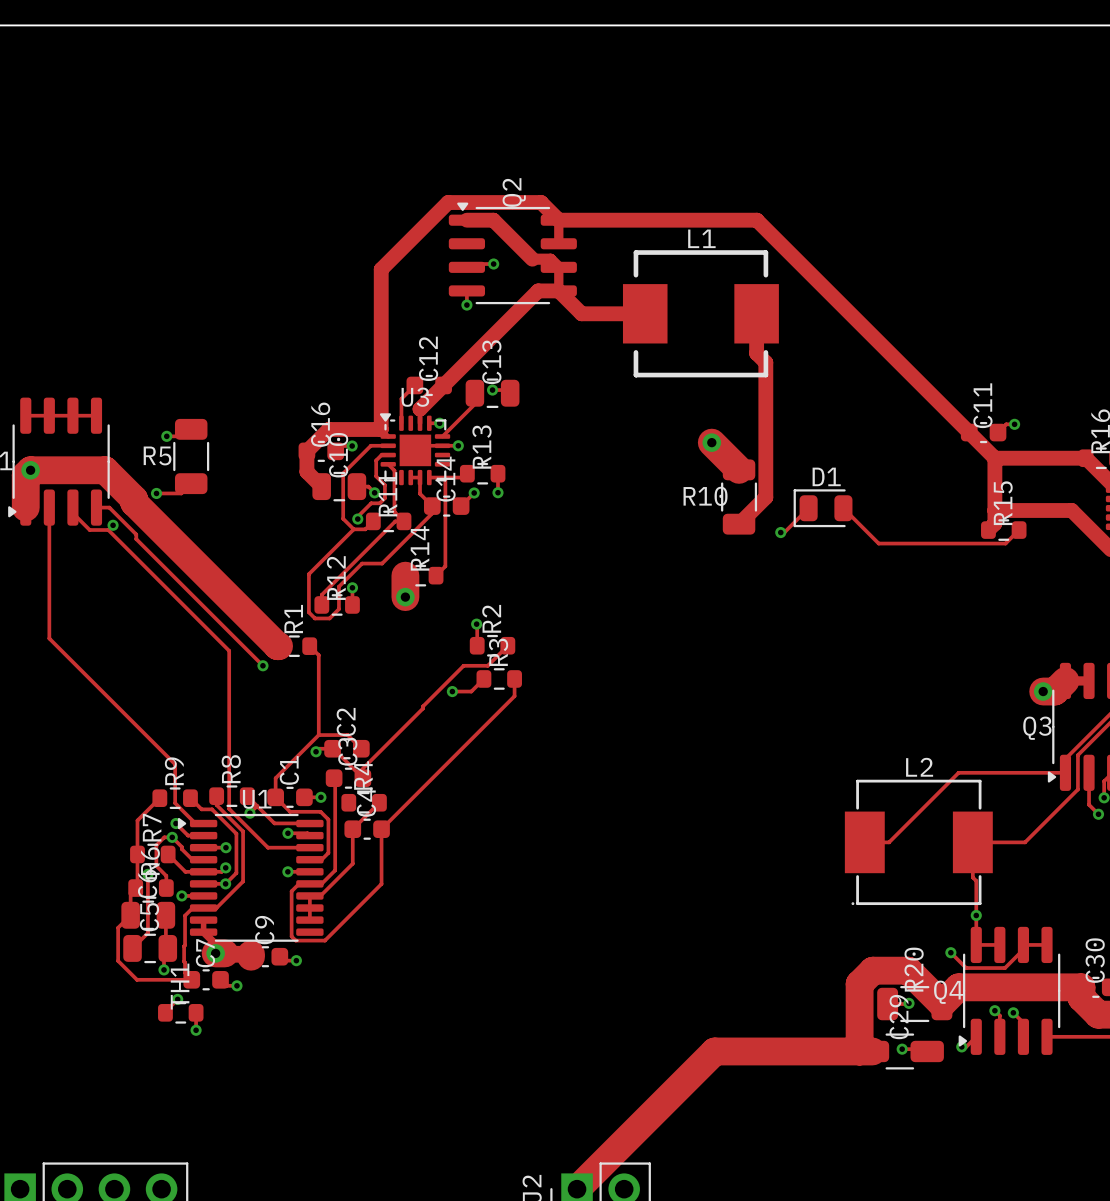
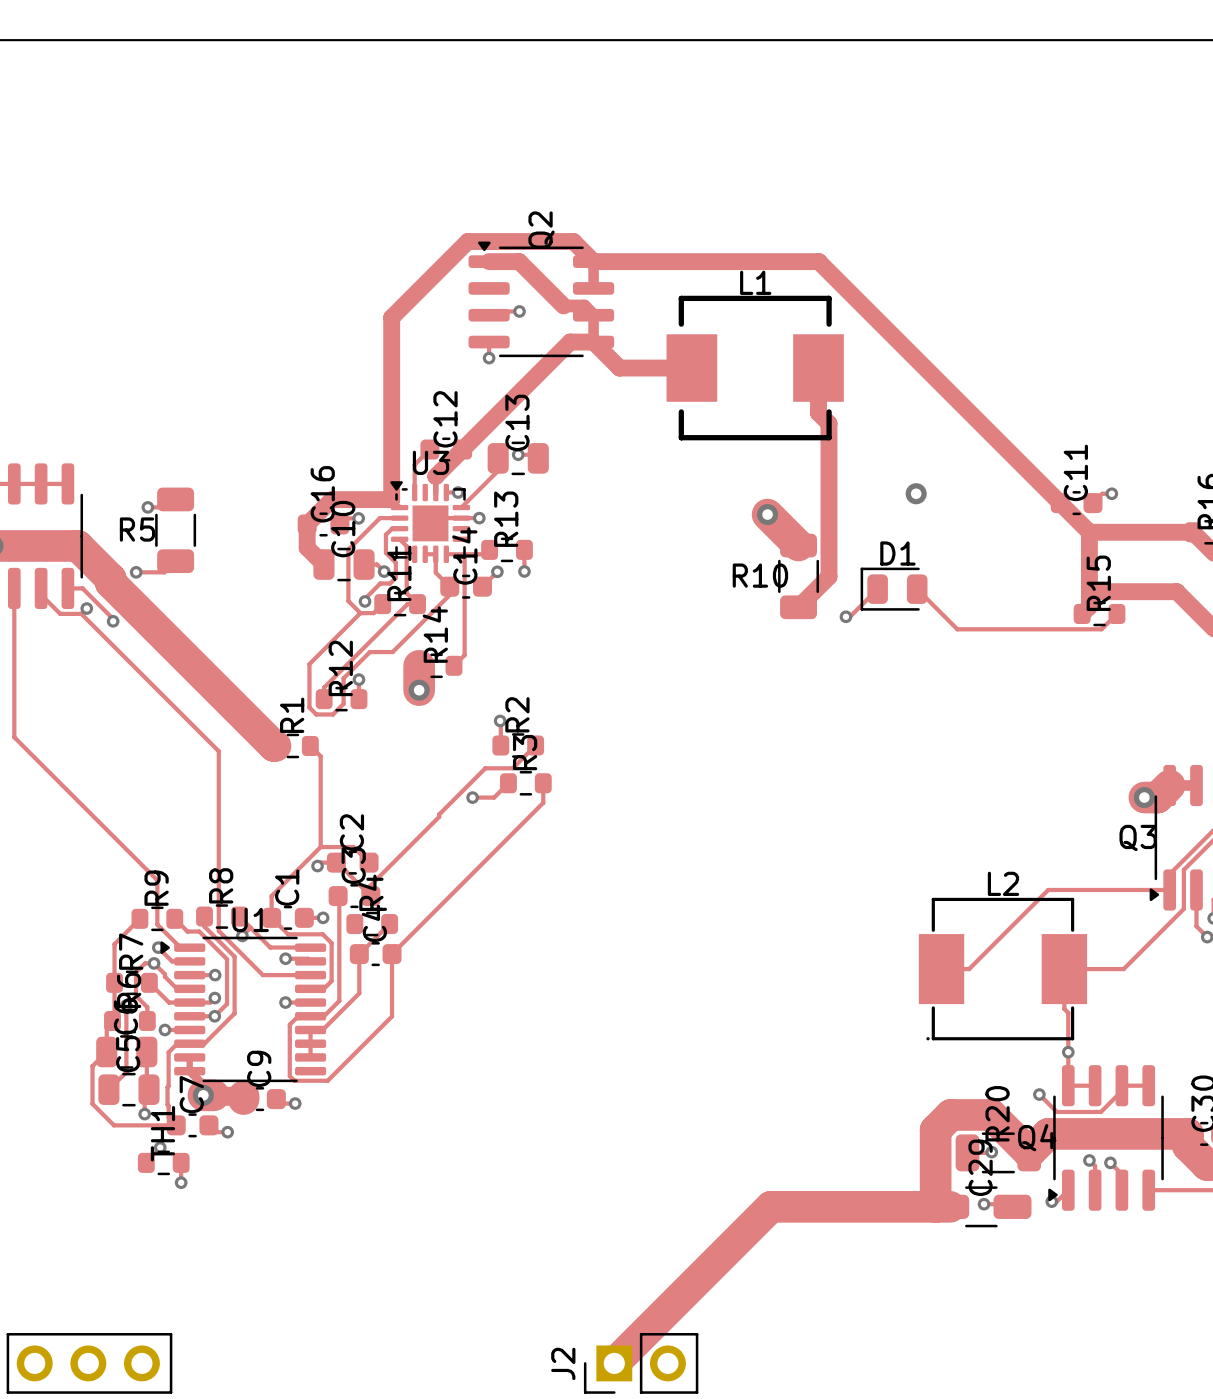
via: none -> (916, 493)
track: (136, 536) (136, 539) (262, 665) -> none
via: none -> (113, 621)
via: (262, 665) -> none

